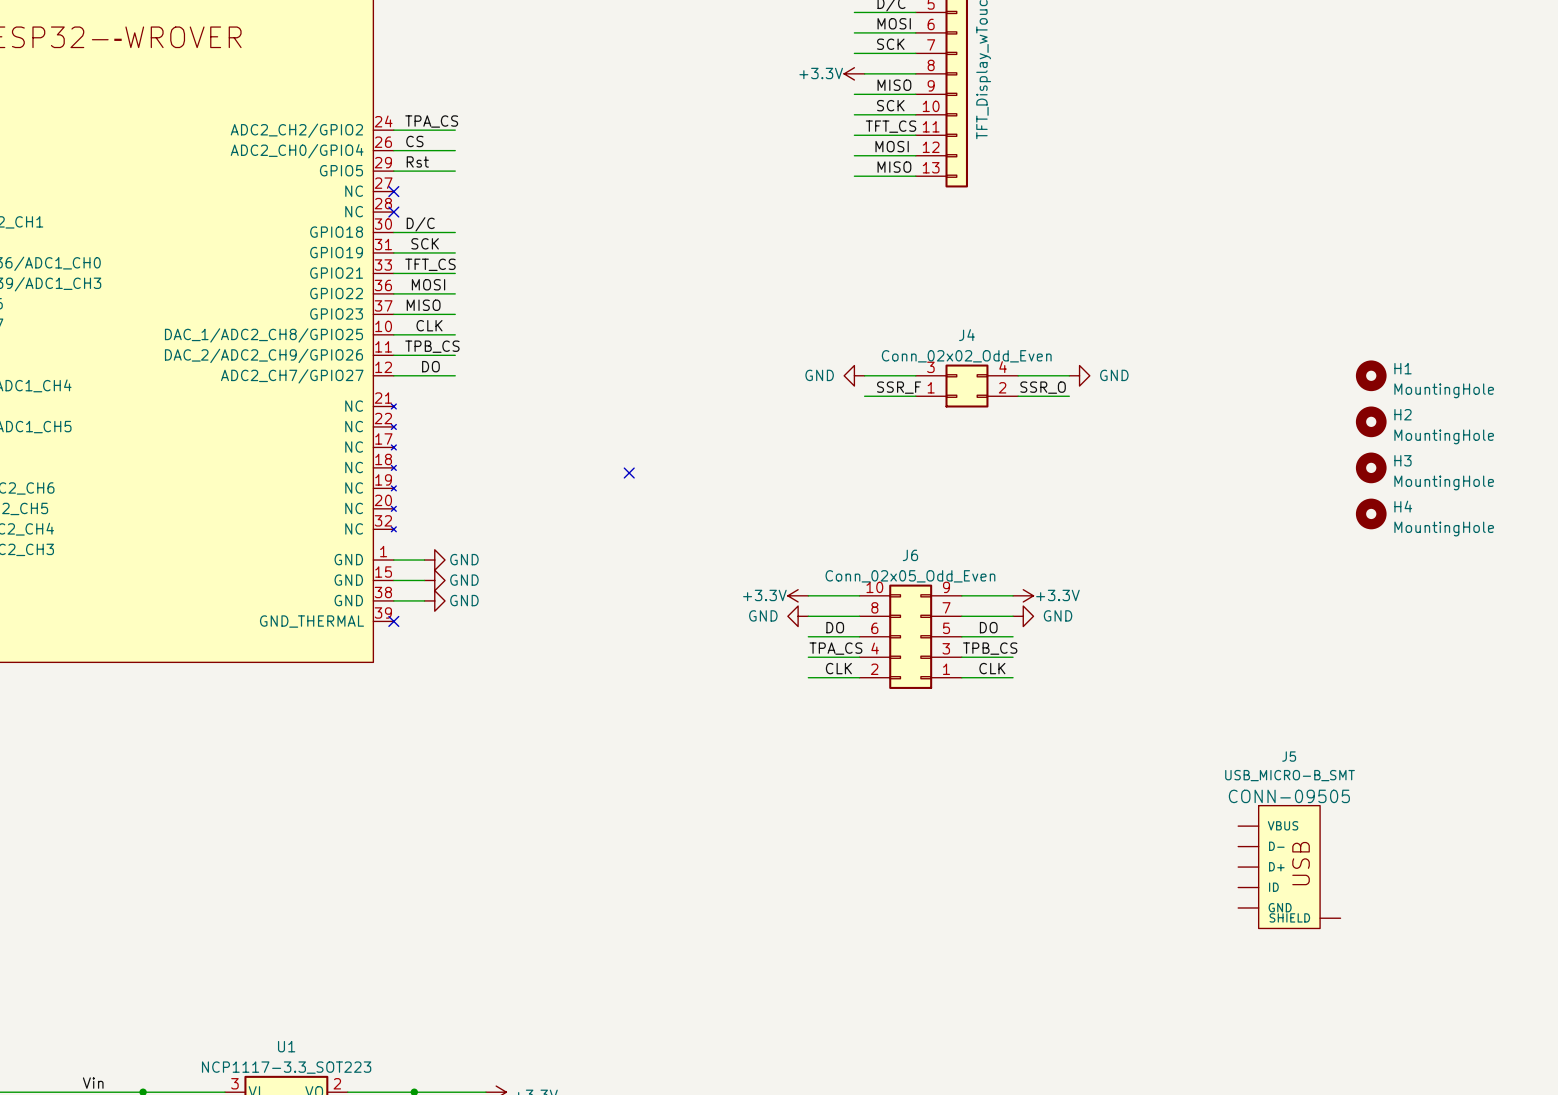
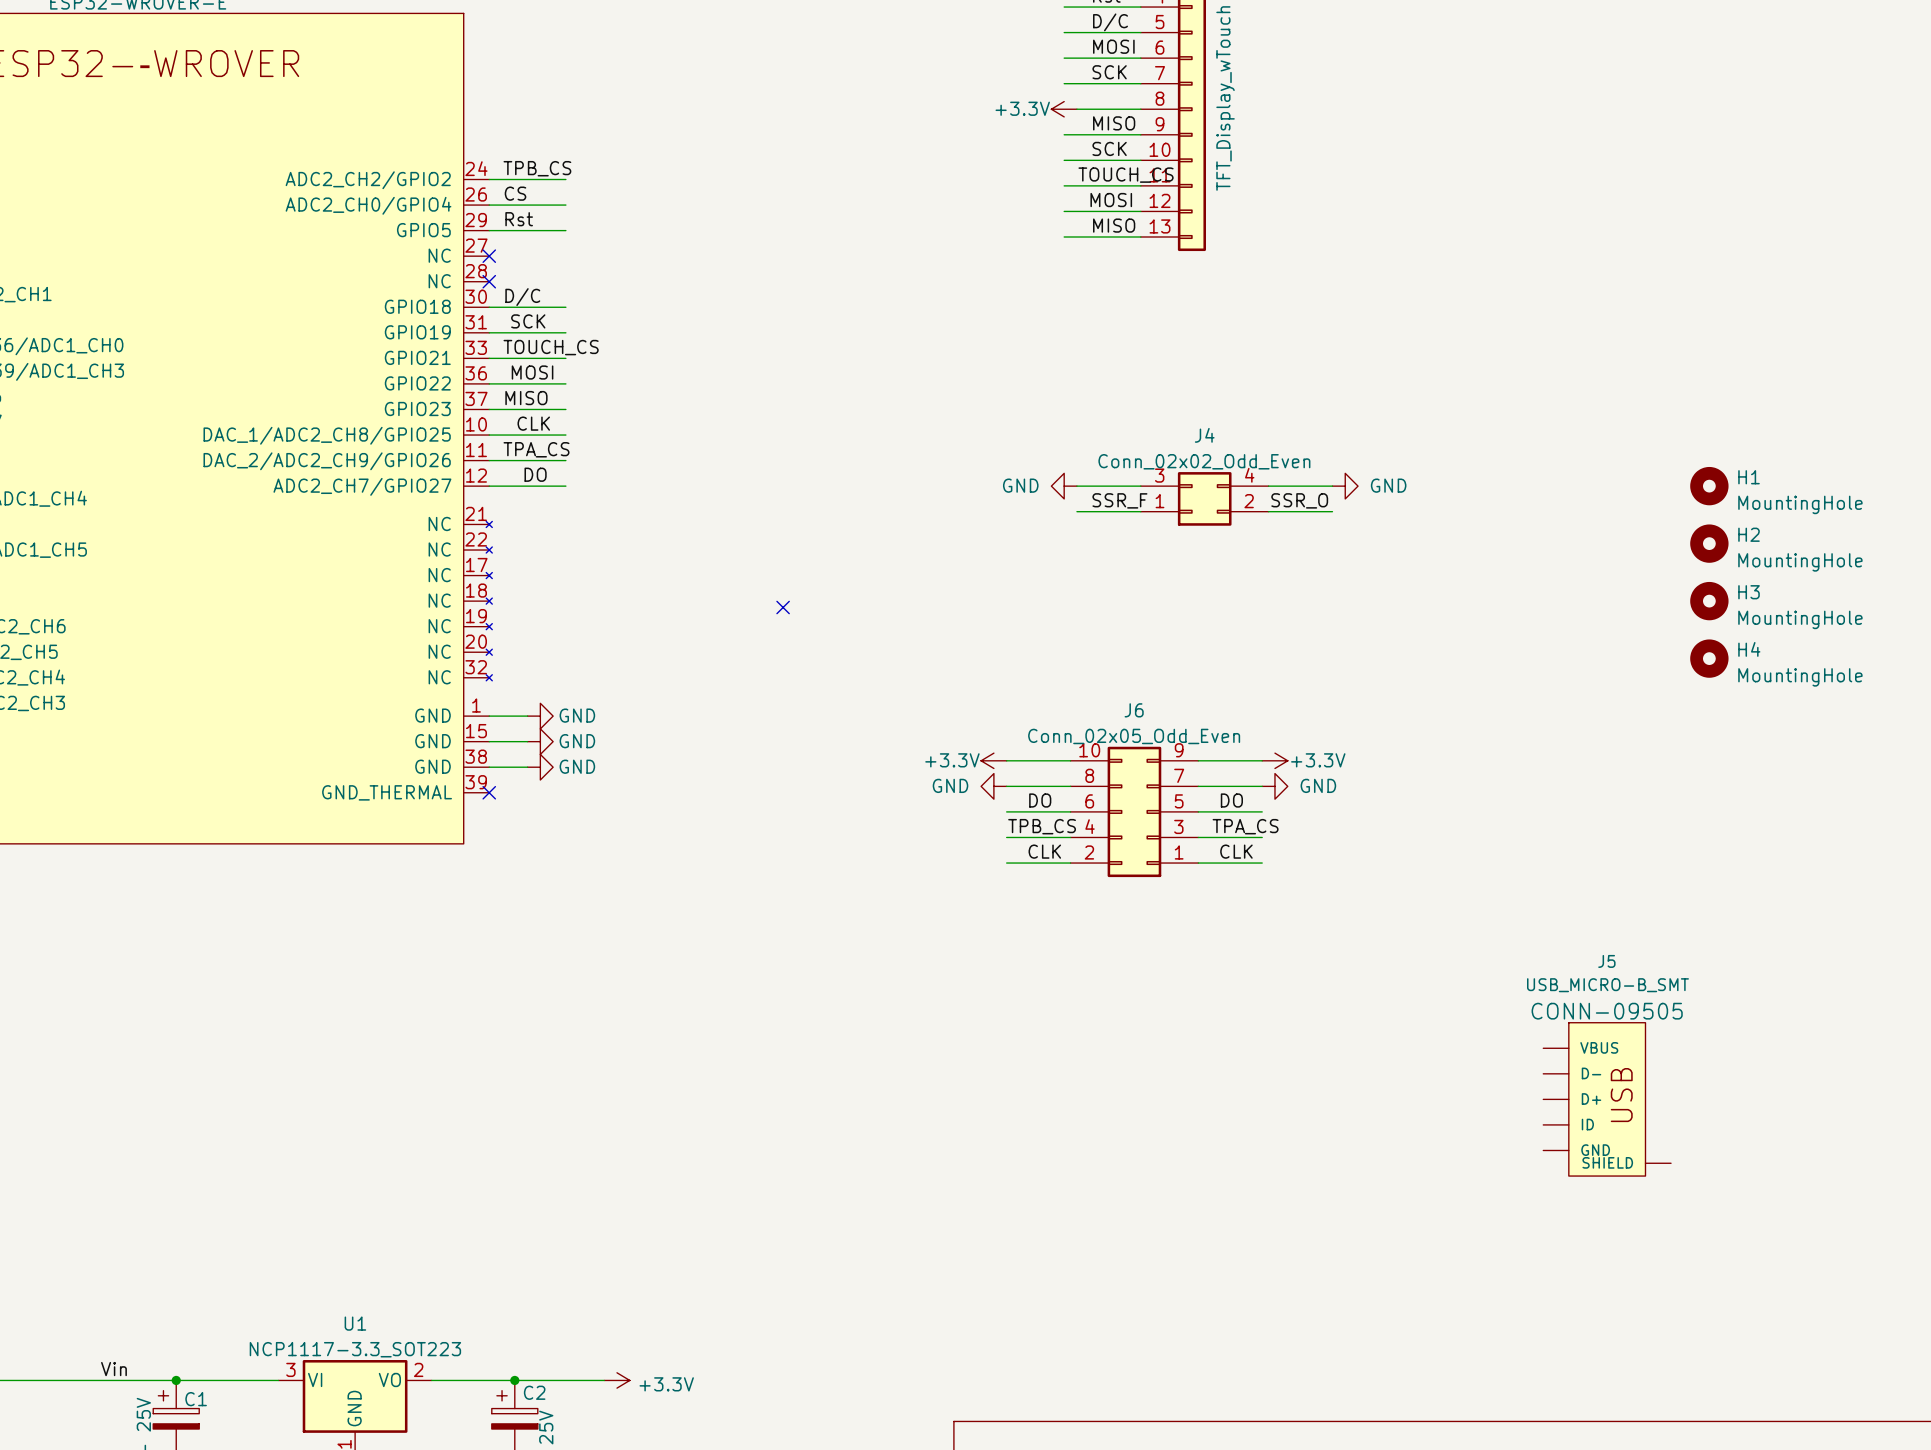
label: TPA_CS (431, 121) -> TPB_CS (537, 168)
label: TFT_CS (891, 126) -> TOUCH_CS (1126, 175)
label: TFT_CS (430, 264) -> TOUCH_CS (551, 347)
label: TPB_CS (432, 346) -> TPA_CS (536, 449)
label: TPA_CS (835, 648) -> TPB_CS (1042, 826)
label: TPB_CS (990, 648) -> TPA_CS (1245, 826)

